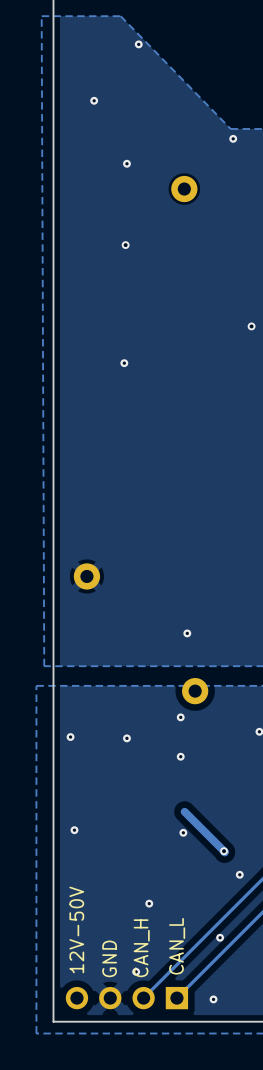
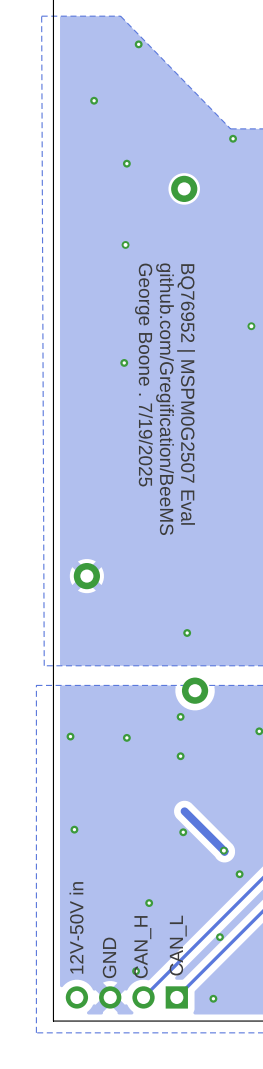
text: none -> George Boone . 7/19/2025 (143, 375)
text: none -> BQ76952 | MSPM0G2507 Eval (186, 394)
text: none -> github.com/Gregification/BeeMS (164, 399)
text: 12V-50V (76, 929) -> 12V-50V in (76, 927)

